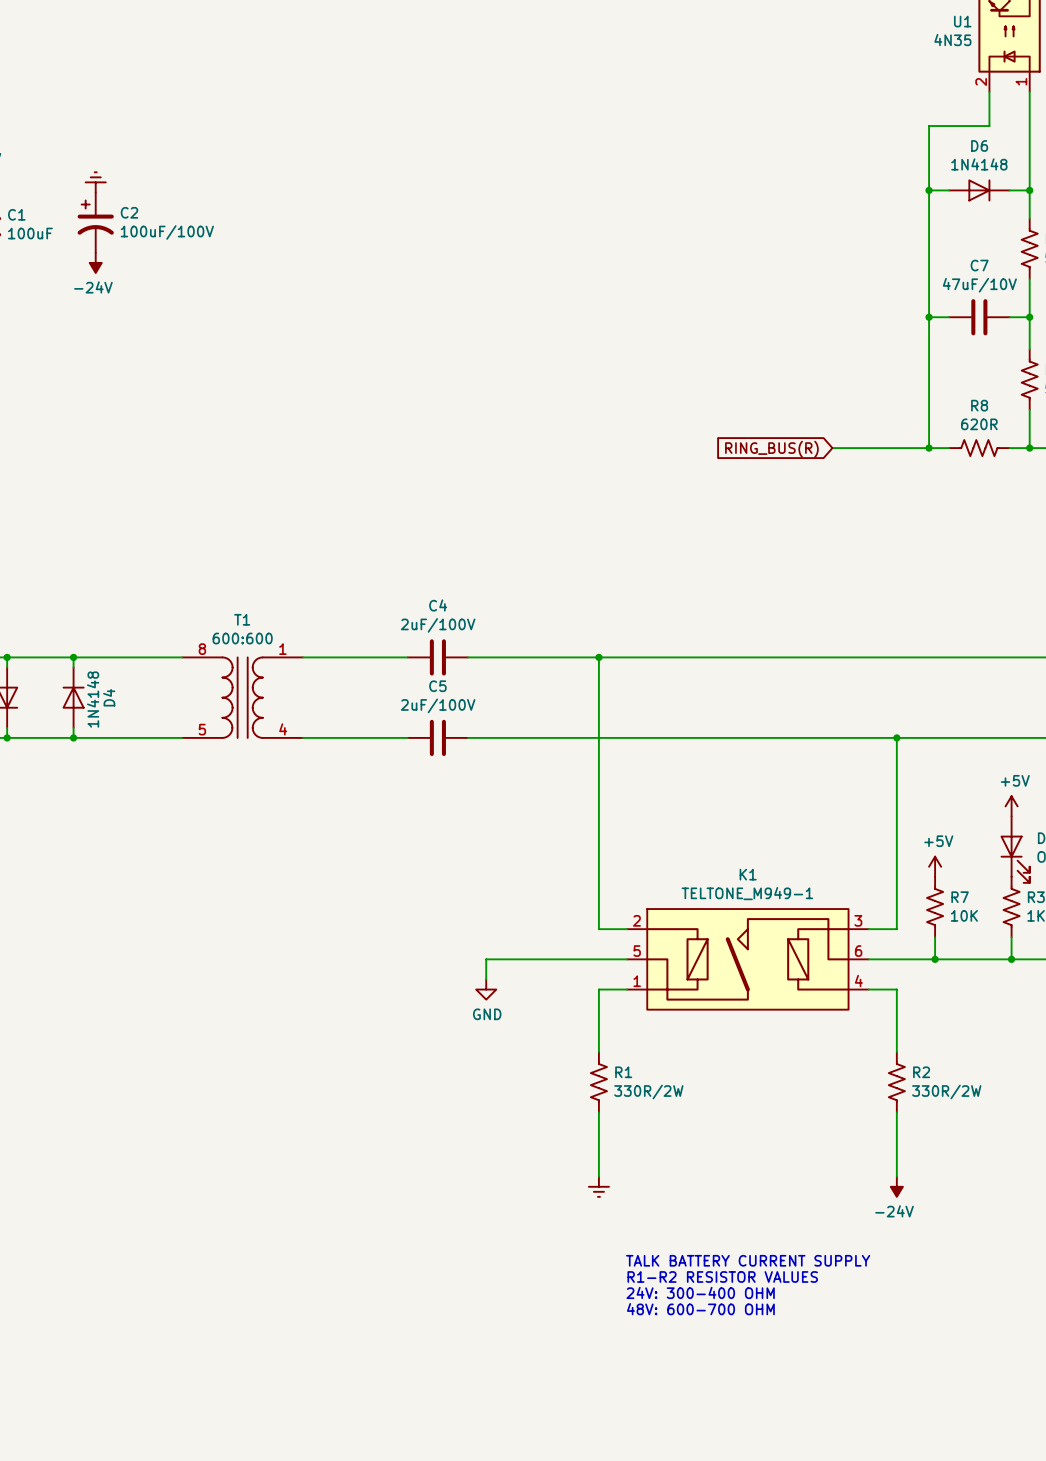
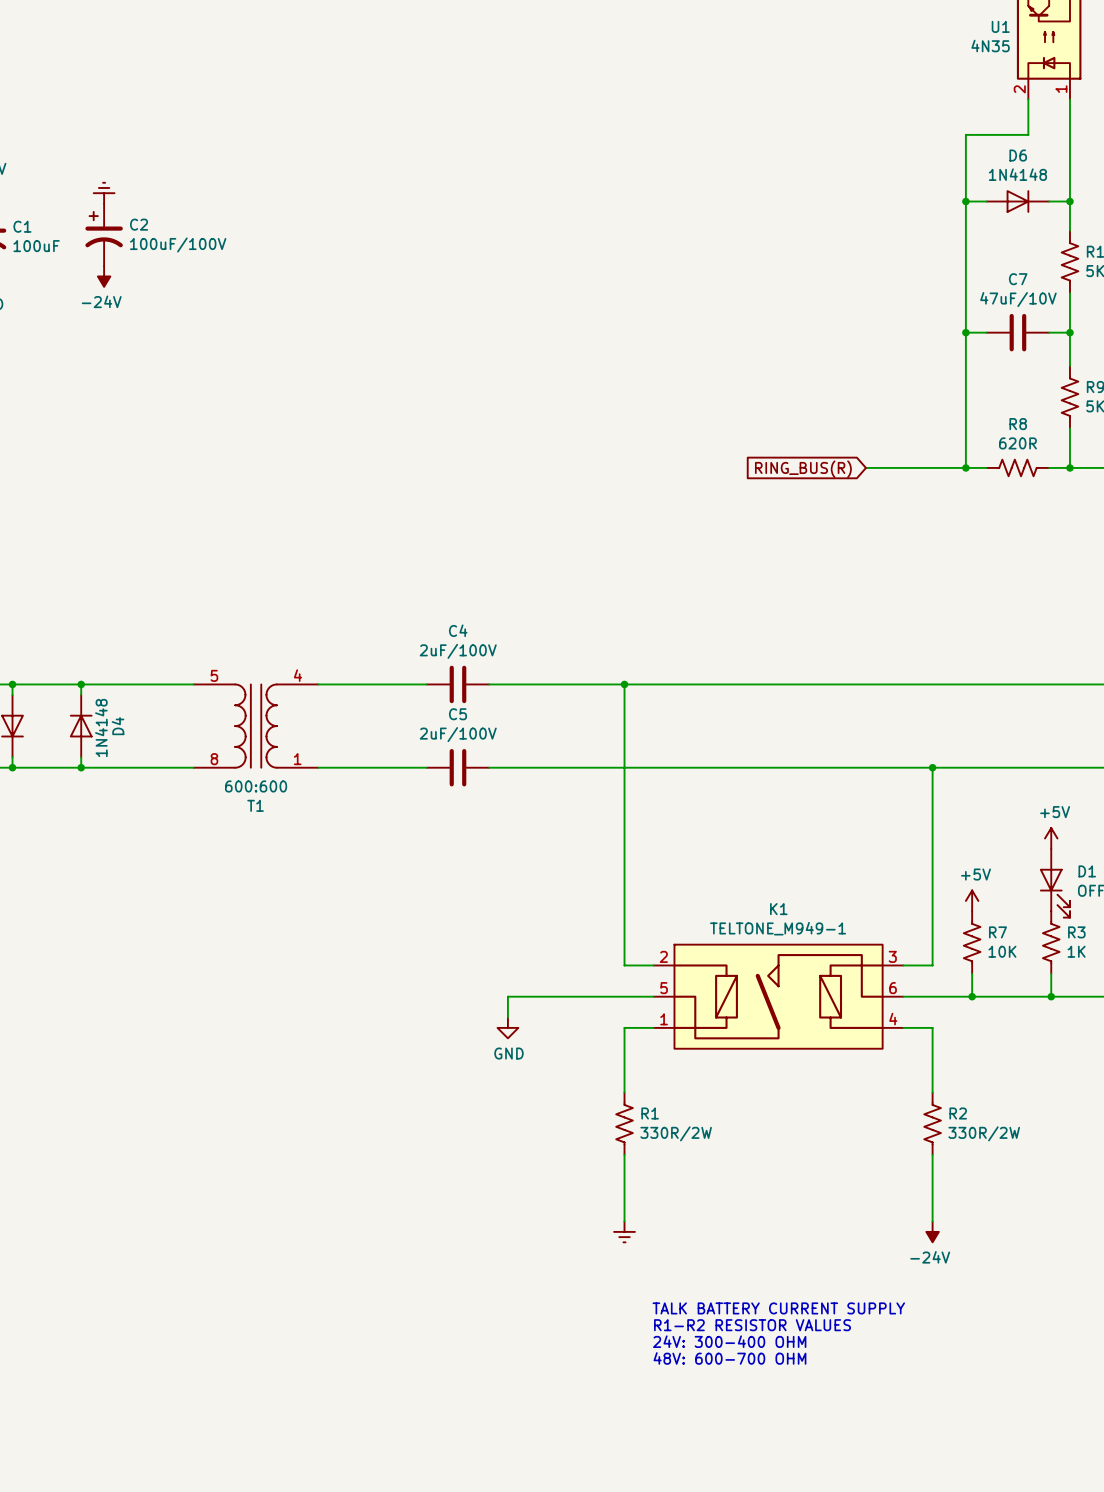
T1 flip: as is (242, 697) -> up-down (256, 726)

